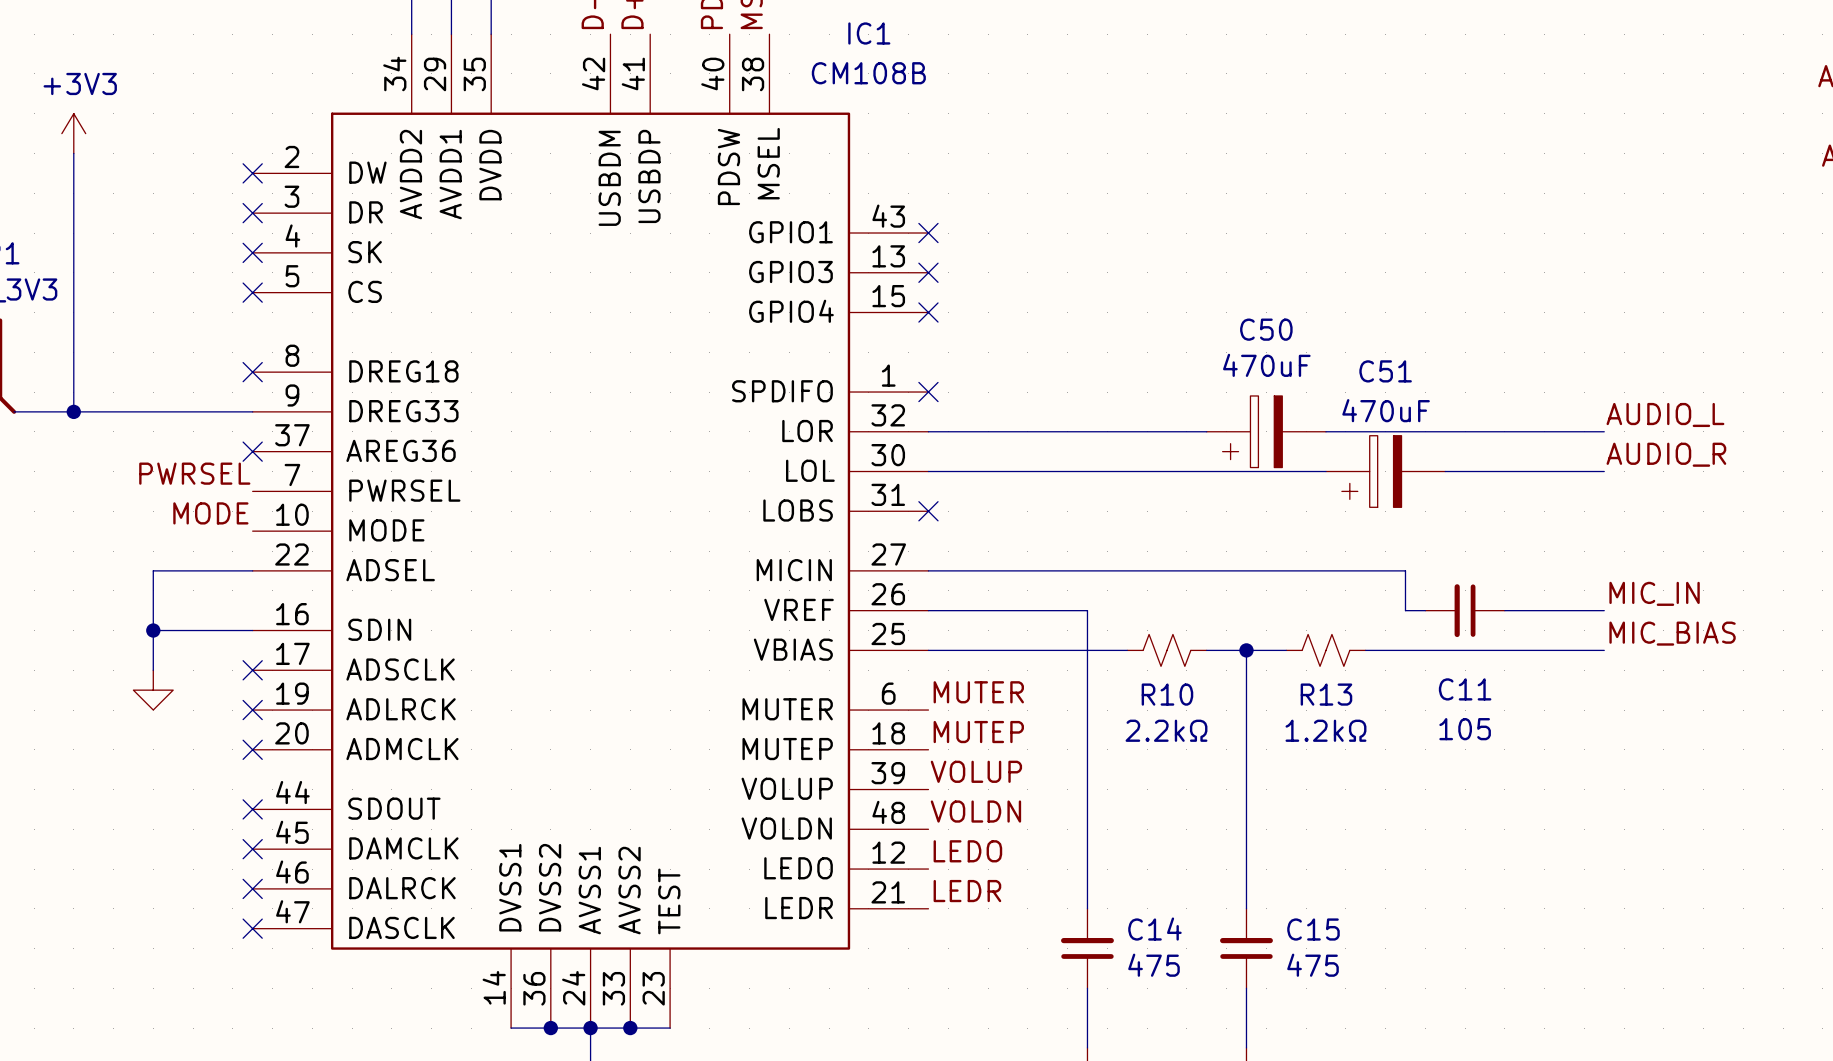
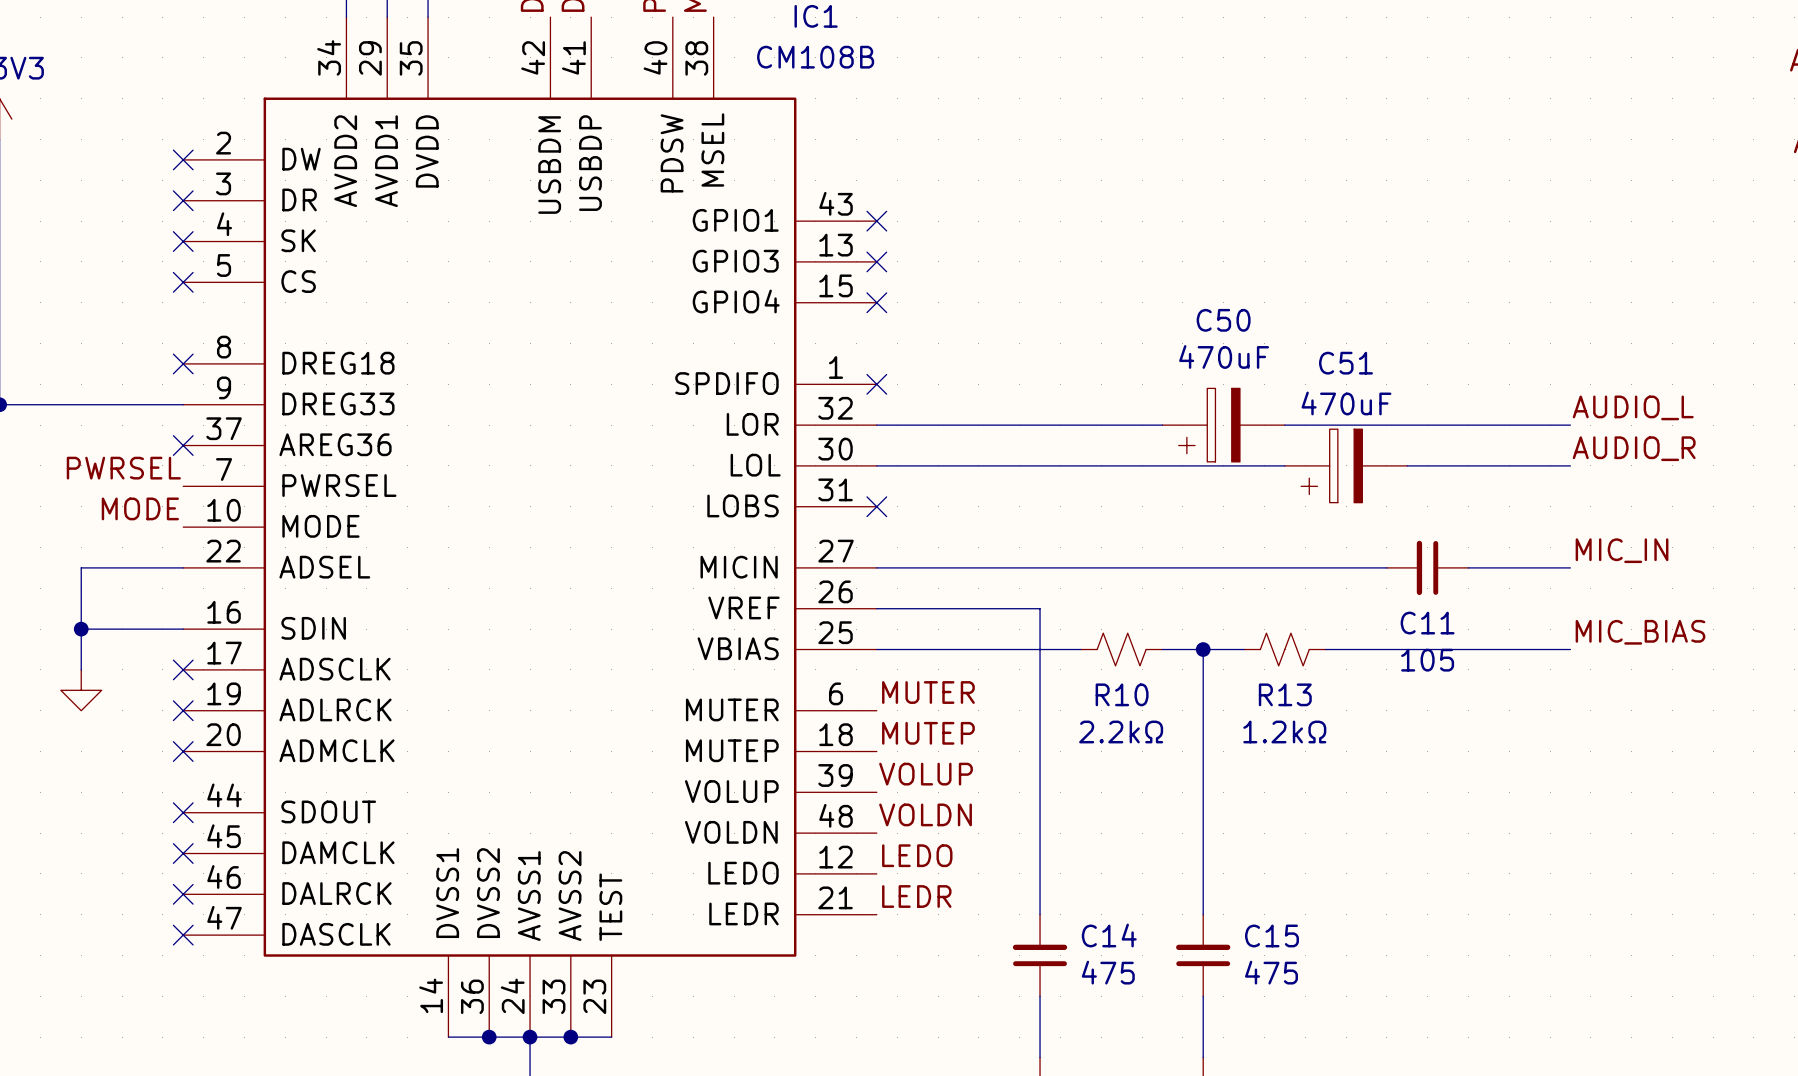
wire: (1405, 570) (1405, 610) (1425, 610) -> (1366, 567) (1386, 567)
label position: MIC_IN (1654, 593) -> MIC_IN (1622, 550)
C11 position: (1465, 610) -> (1427, 567)
wire: (1504, 610) (1604, 610) -> (1468, 567) (1570, 567)
C11 name position: C11 (1465, 689) -> C11 (1427, 623)
C11 value position: 105 (1465, 729) -> 105 (1427, 660)

